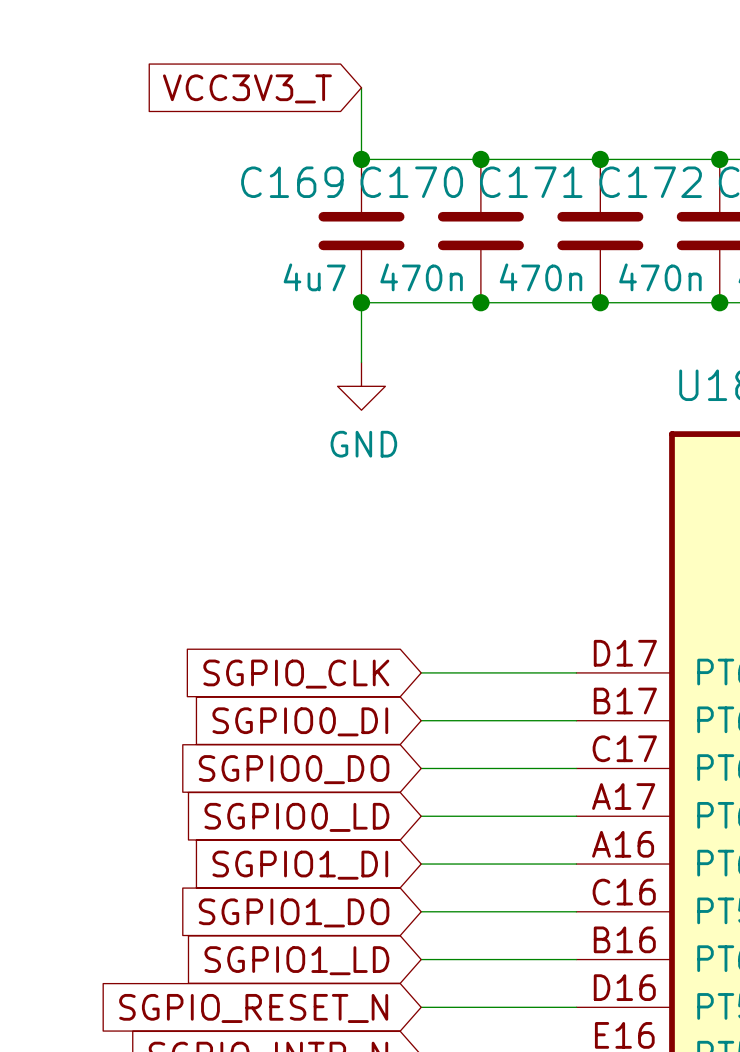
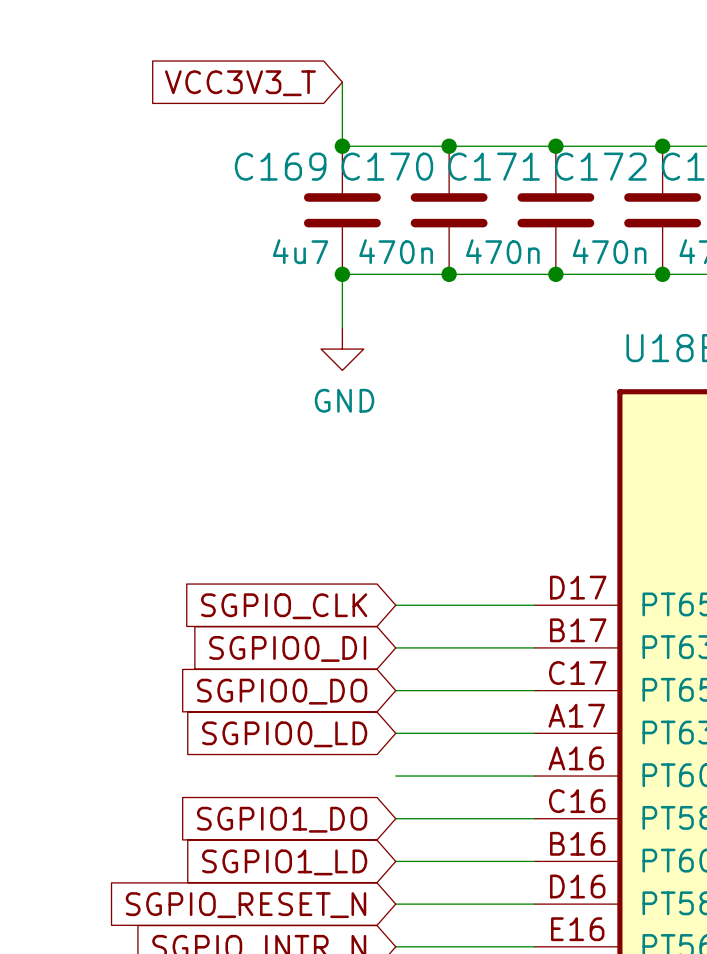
global label: SGPIO1_DI (300, 865) -> none

